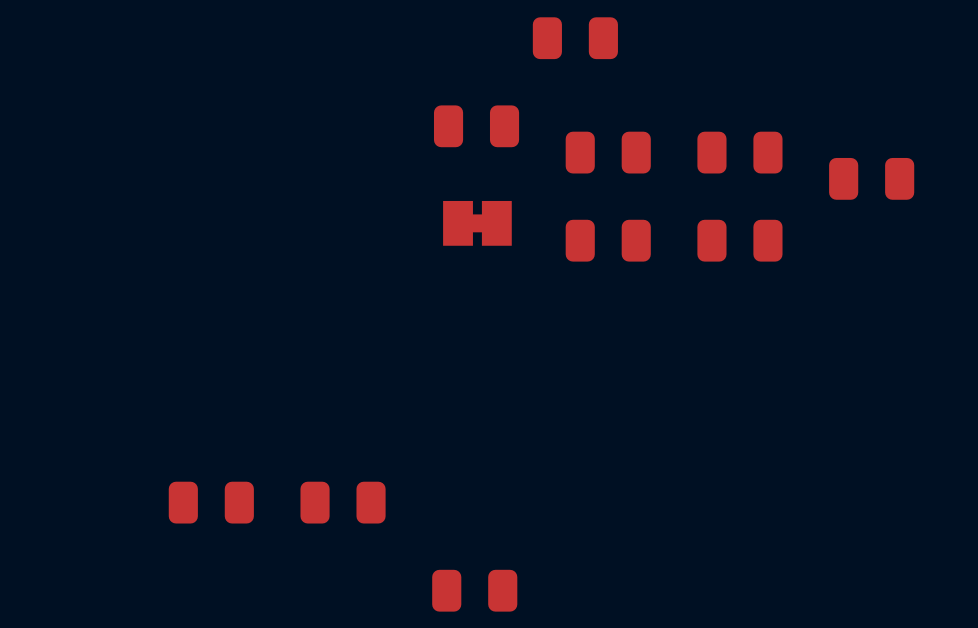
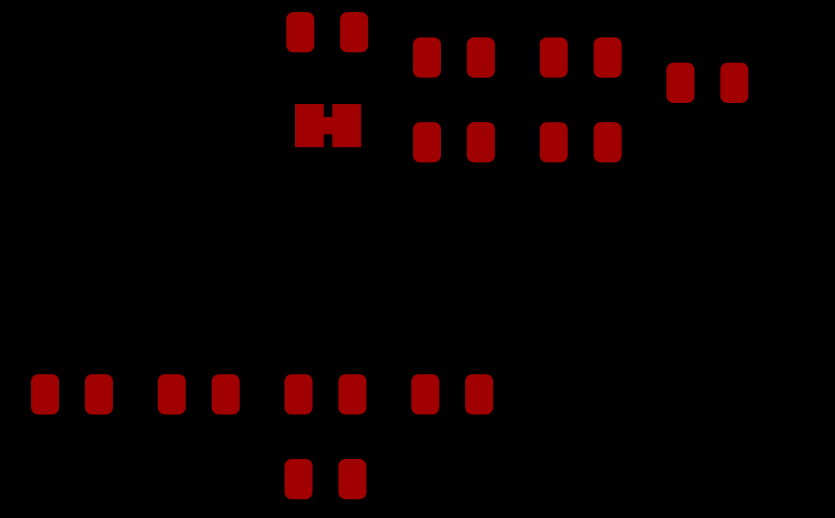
part: none -> (325, 394)
part: none -> (452, 394)

